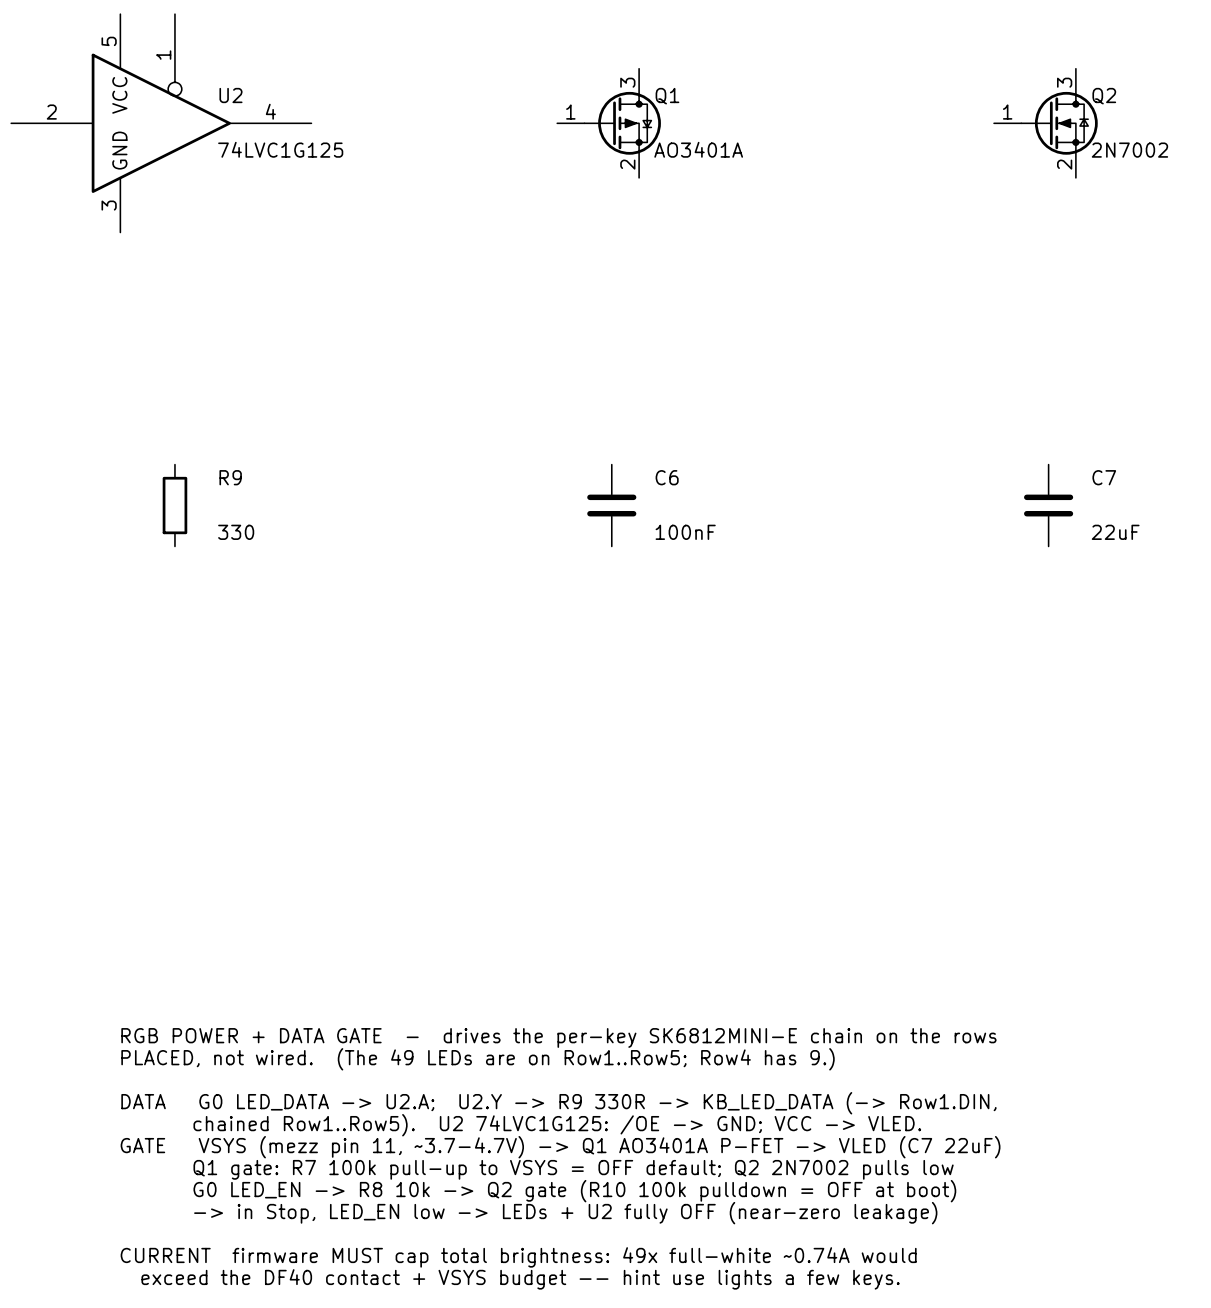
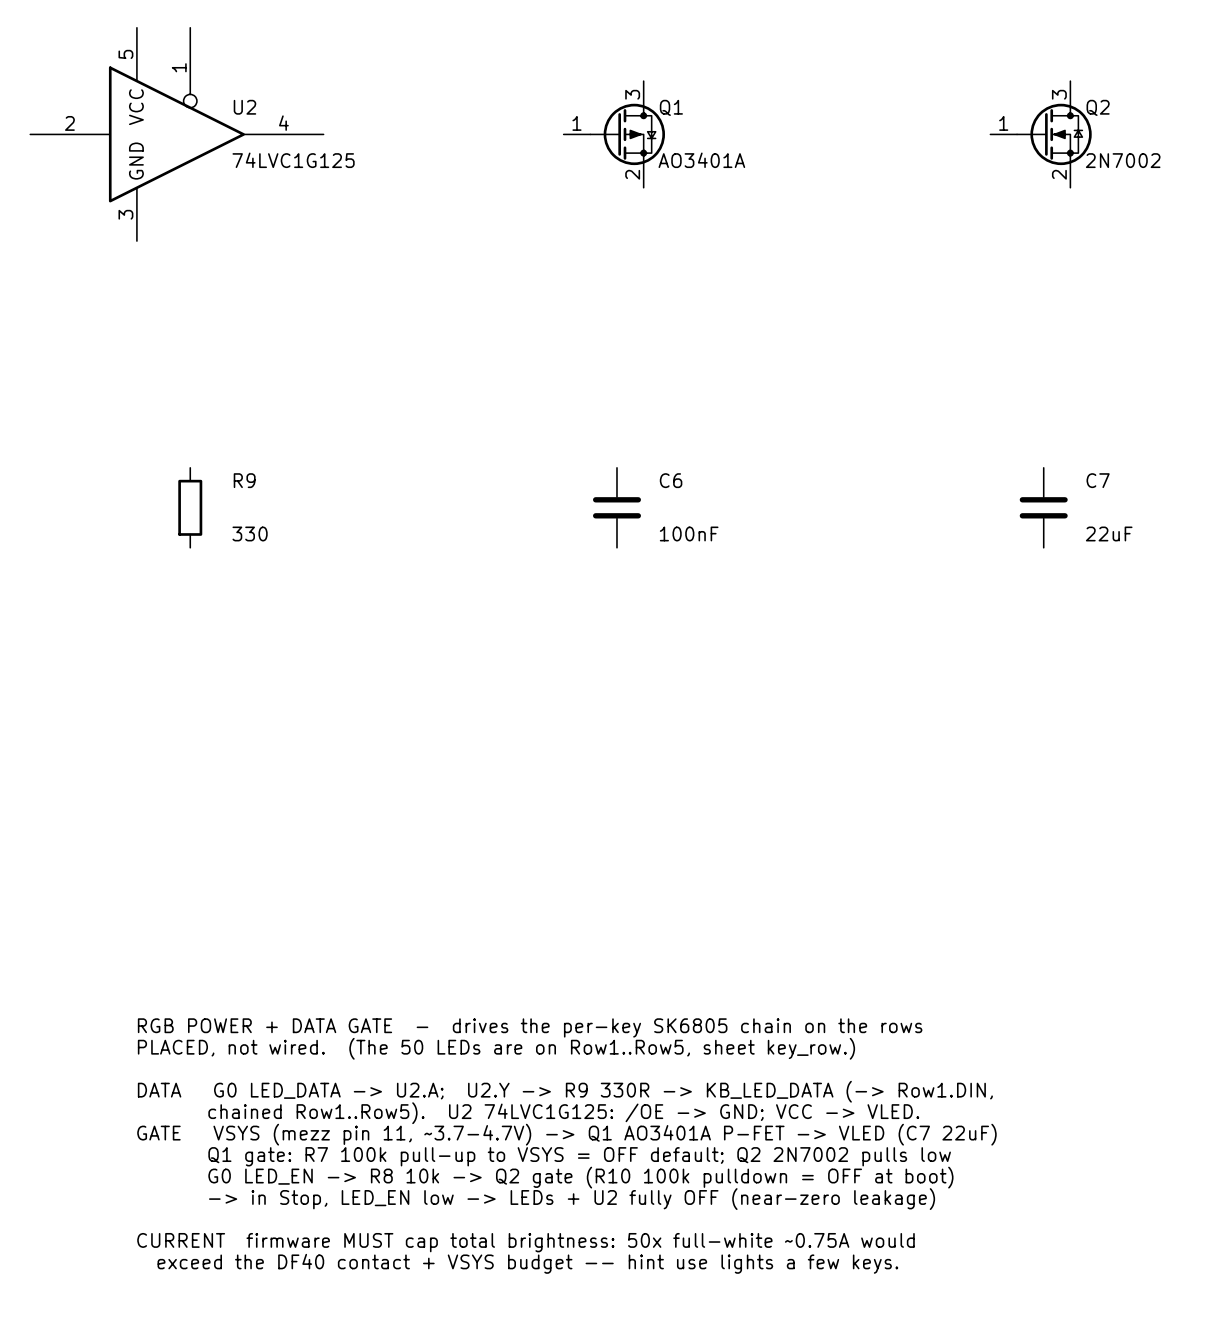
text: RGB POWER + DATA GATE - drives the per-key SK6812MINI-E chain on the rows (558, 1037) -> RGB POWER + DATA GATE - drives the per-key SK6805 chain on the rows (530, 1027)
text: PLACED, not wired. (The 49 LEDs are on Row1..Row5; Row4 has 9.) (478, 1059) -> PLACED, not wired. (The 50 LEDs are on Row1..Row5, sheet key_row.) (496, 1048)
text: CURRENT firmware MUST cap total brightness: 49x full-white ~0.74A would (518, 1257) -> CURRENT firmware MUST cap total brightness: 50x full-white ~0.75A would (525, 1242)

